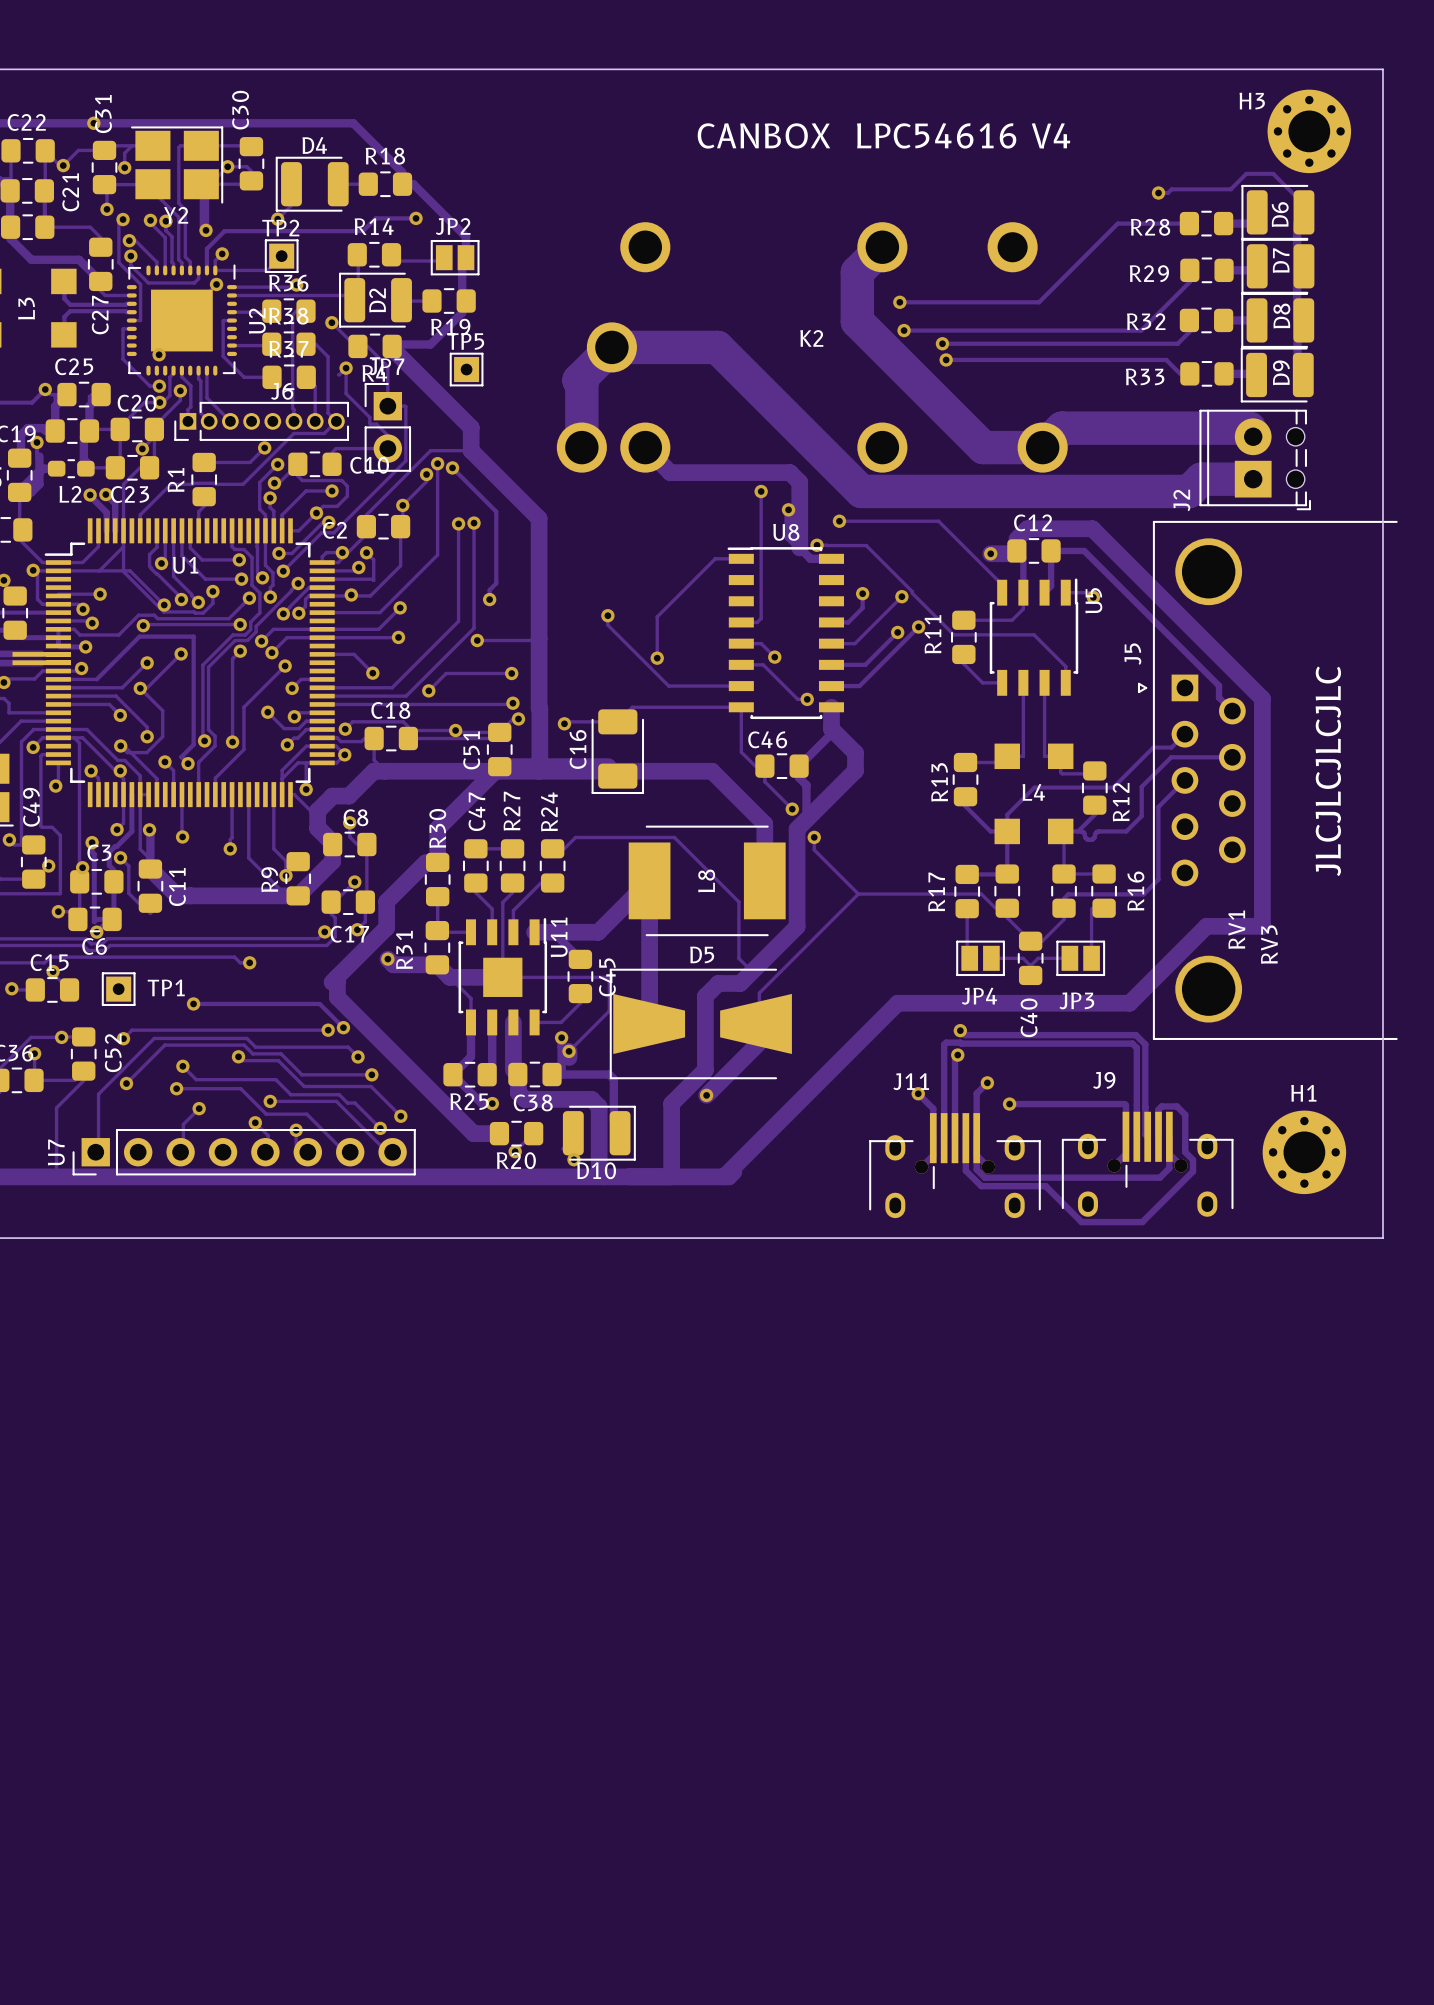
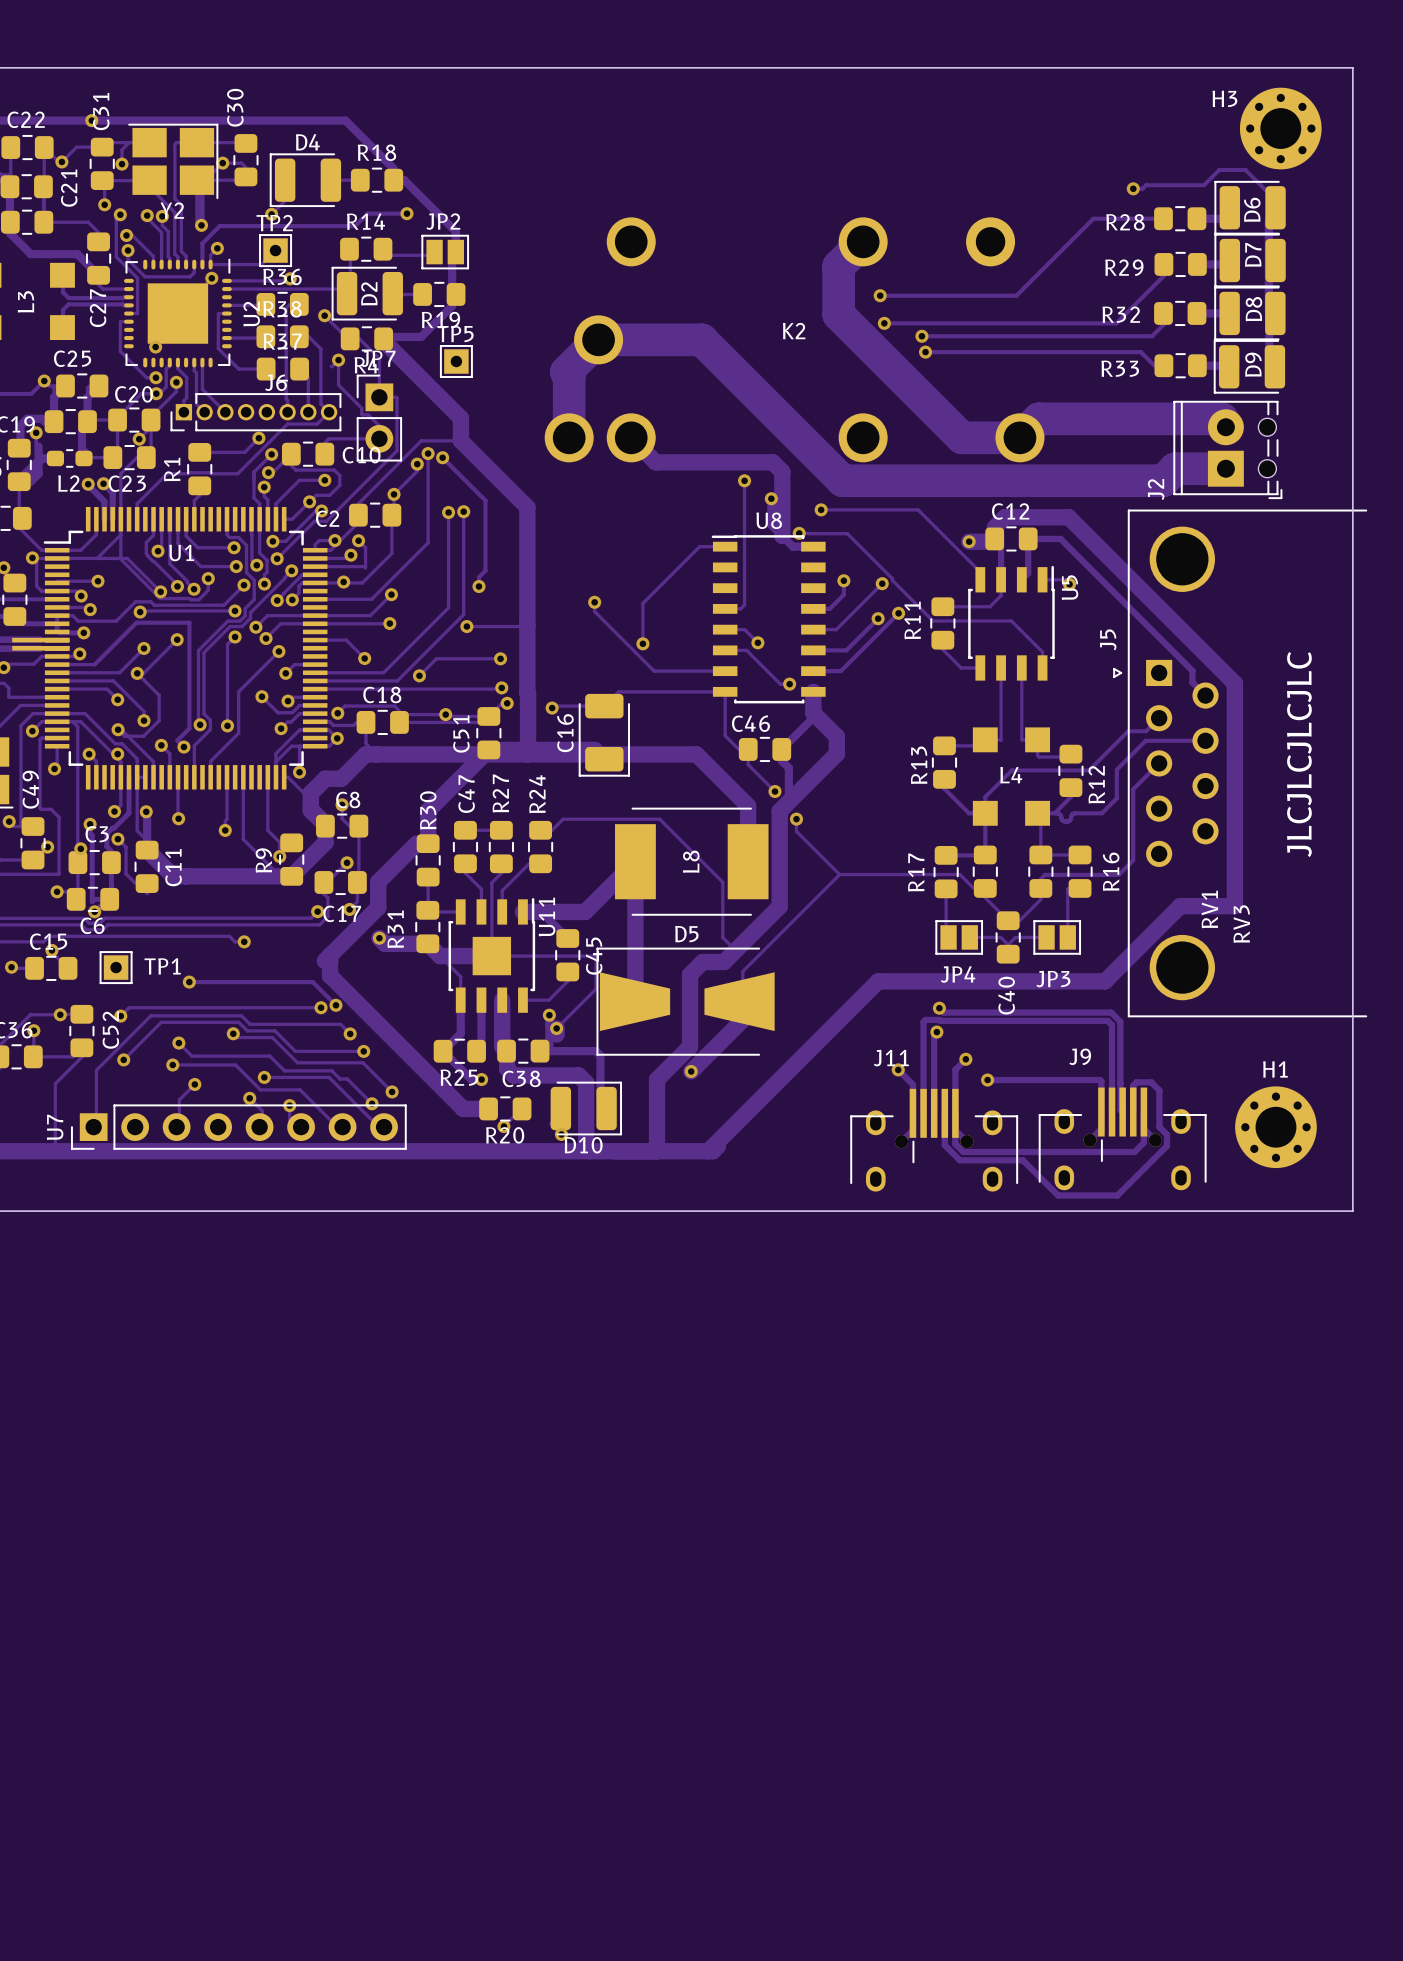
text: CANBOX LPC54616 V4 (883, 135) -> none

